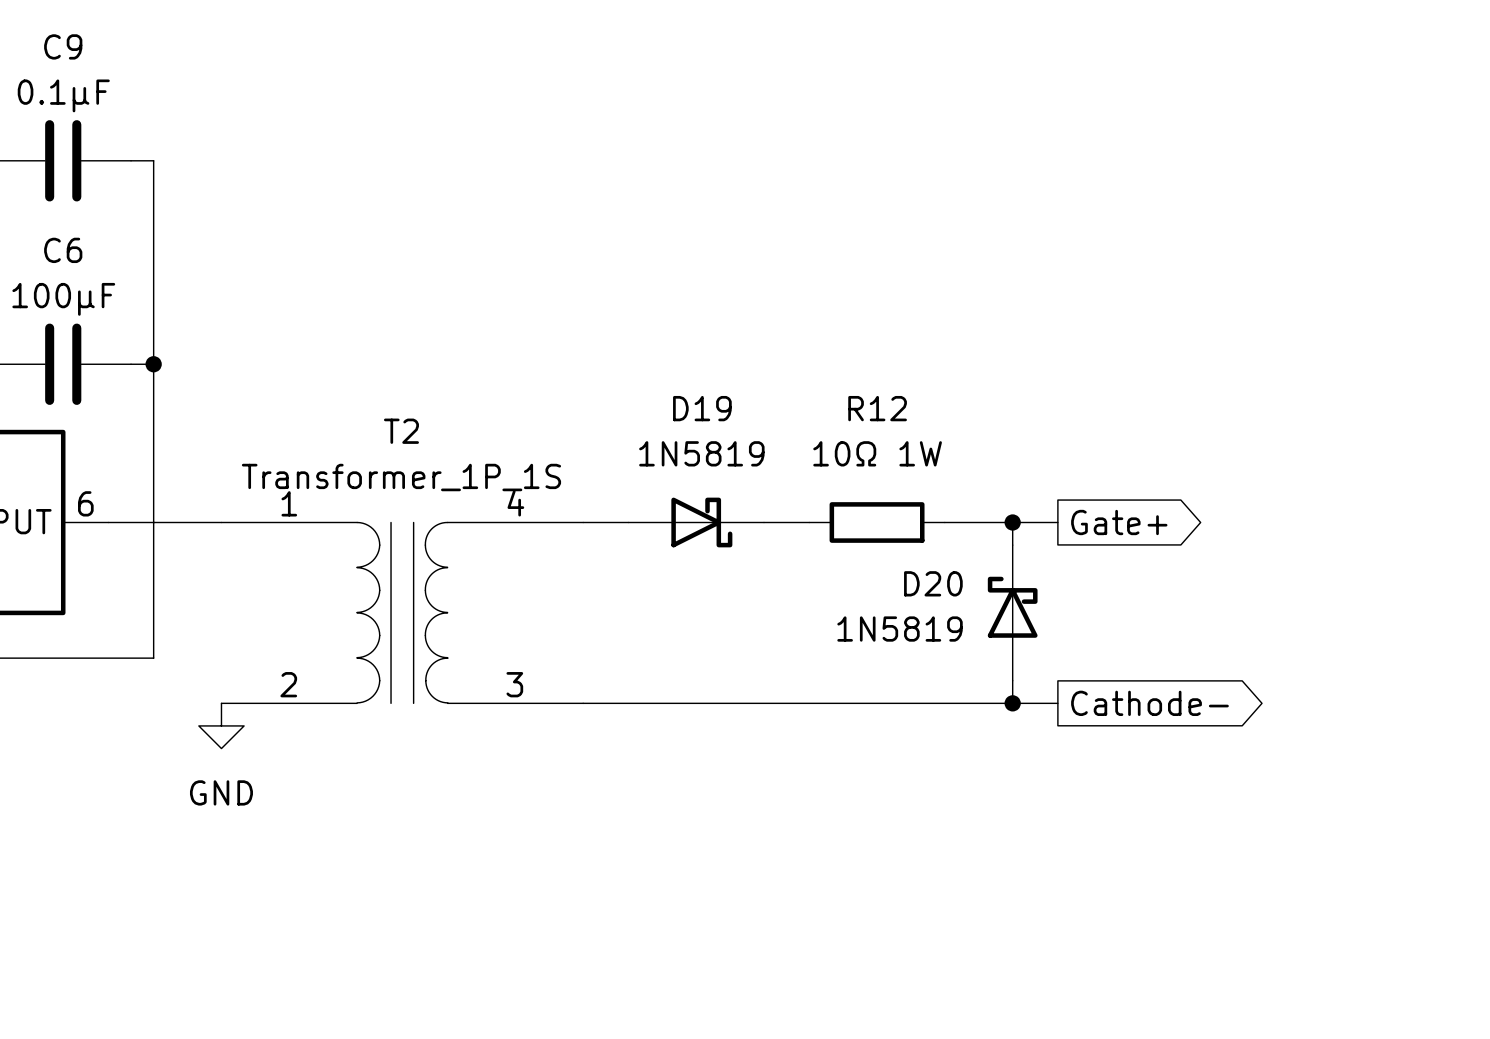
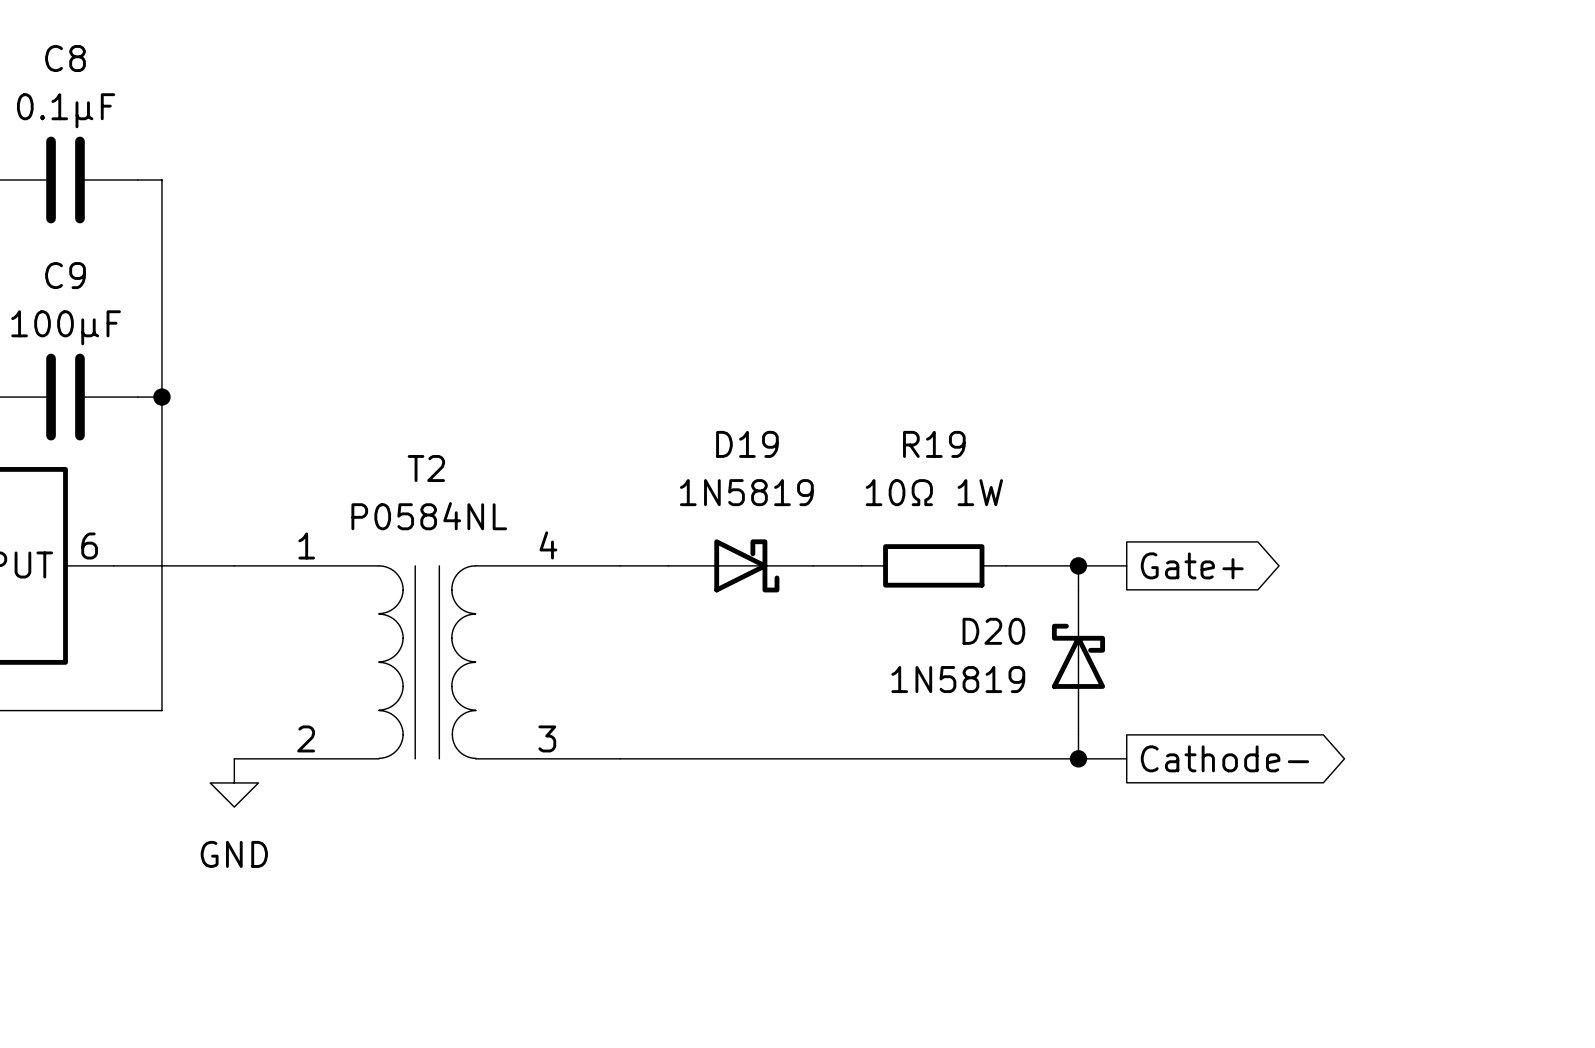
C9 name: C9 (63, 46) -> C8 (65, 58)
C6 name: C6 (63, 250) -> C9 (65, 275)
R12 name: R12 (877, 408) -> R19 (934, 444)
T2 value: Transformer_1P_1S (401, 477) -> P0584NL (429, 516)

